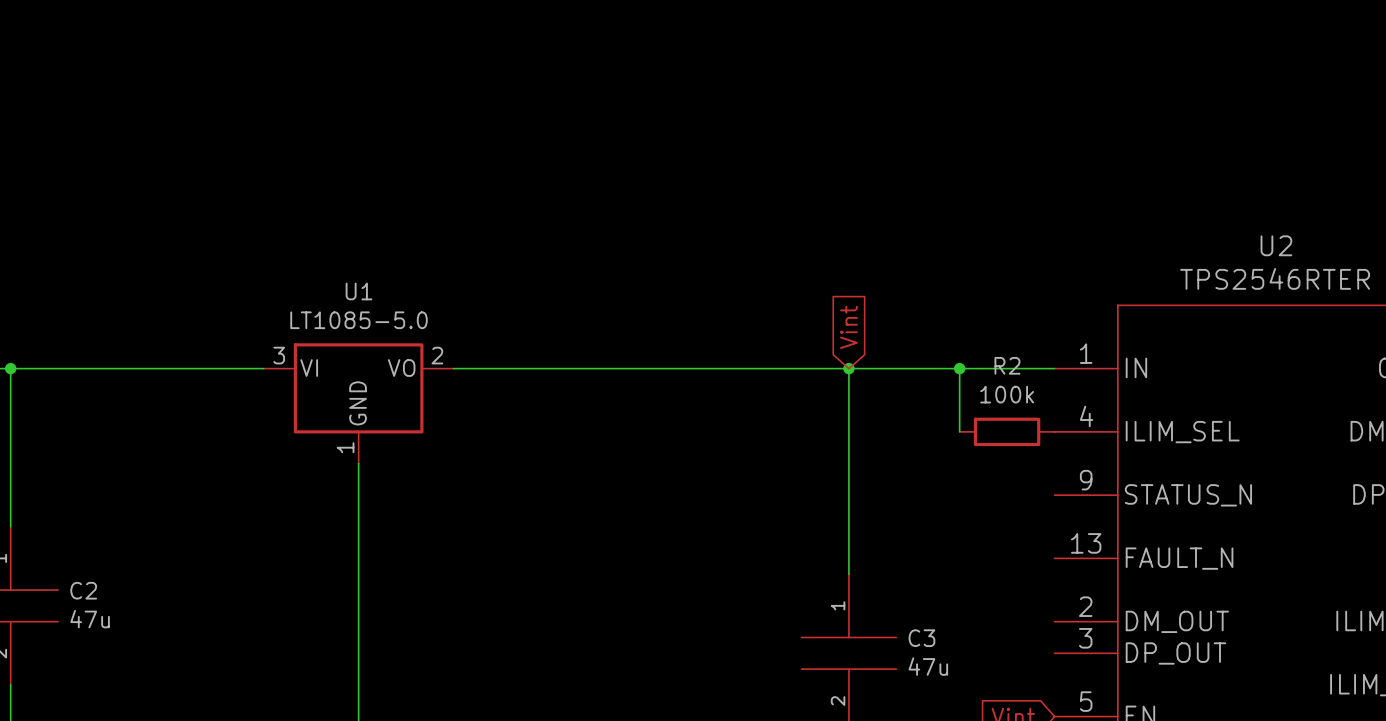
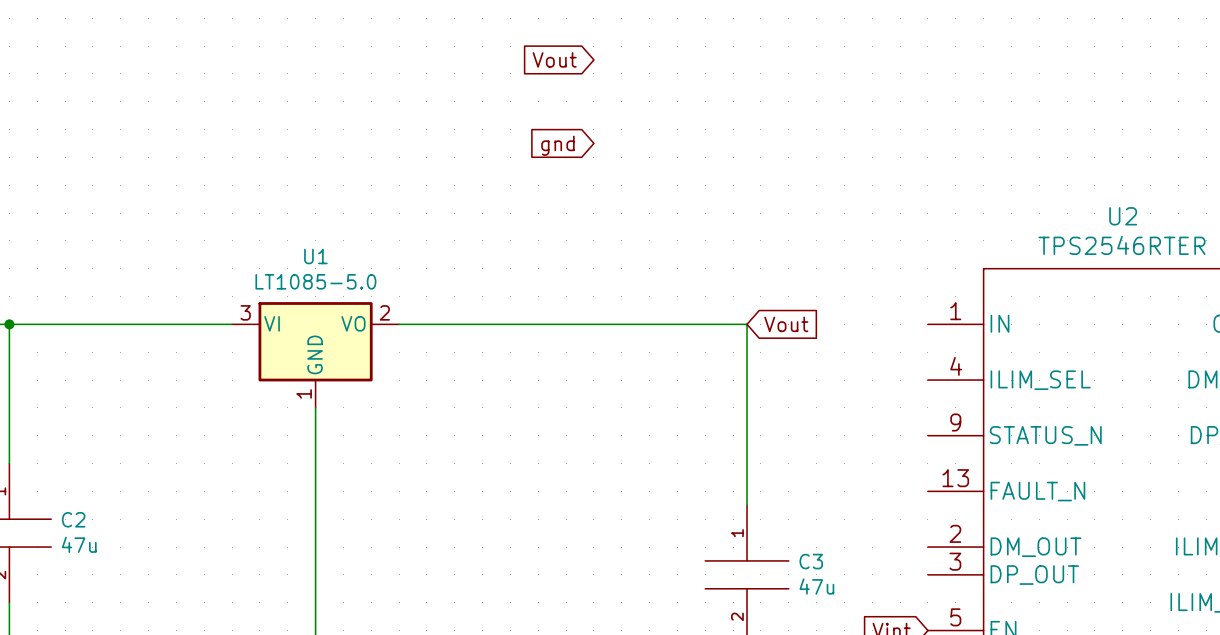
global label: none -> Vout (554, 59)
global label: none -> gnd (557, 145)
global label: Vint (848, 327) -> Vout (786, 324)
wire: (848, 368) (1054, 368) -> none
junction: (848, 368) -> none
wire: (959, 368) (959, 431) -> none
junction: (959, 368) -> none
R2: 100k (1007, 431) -> none

